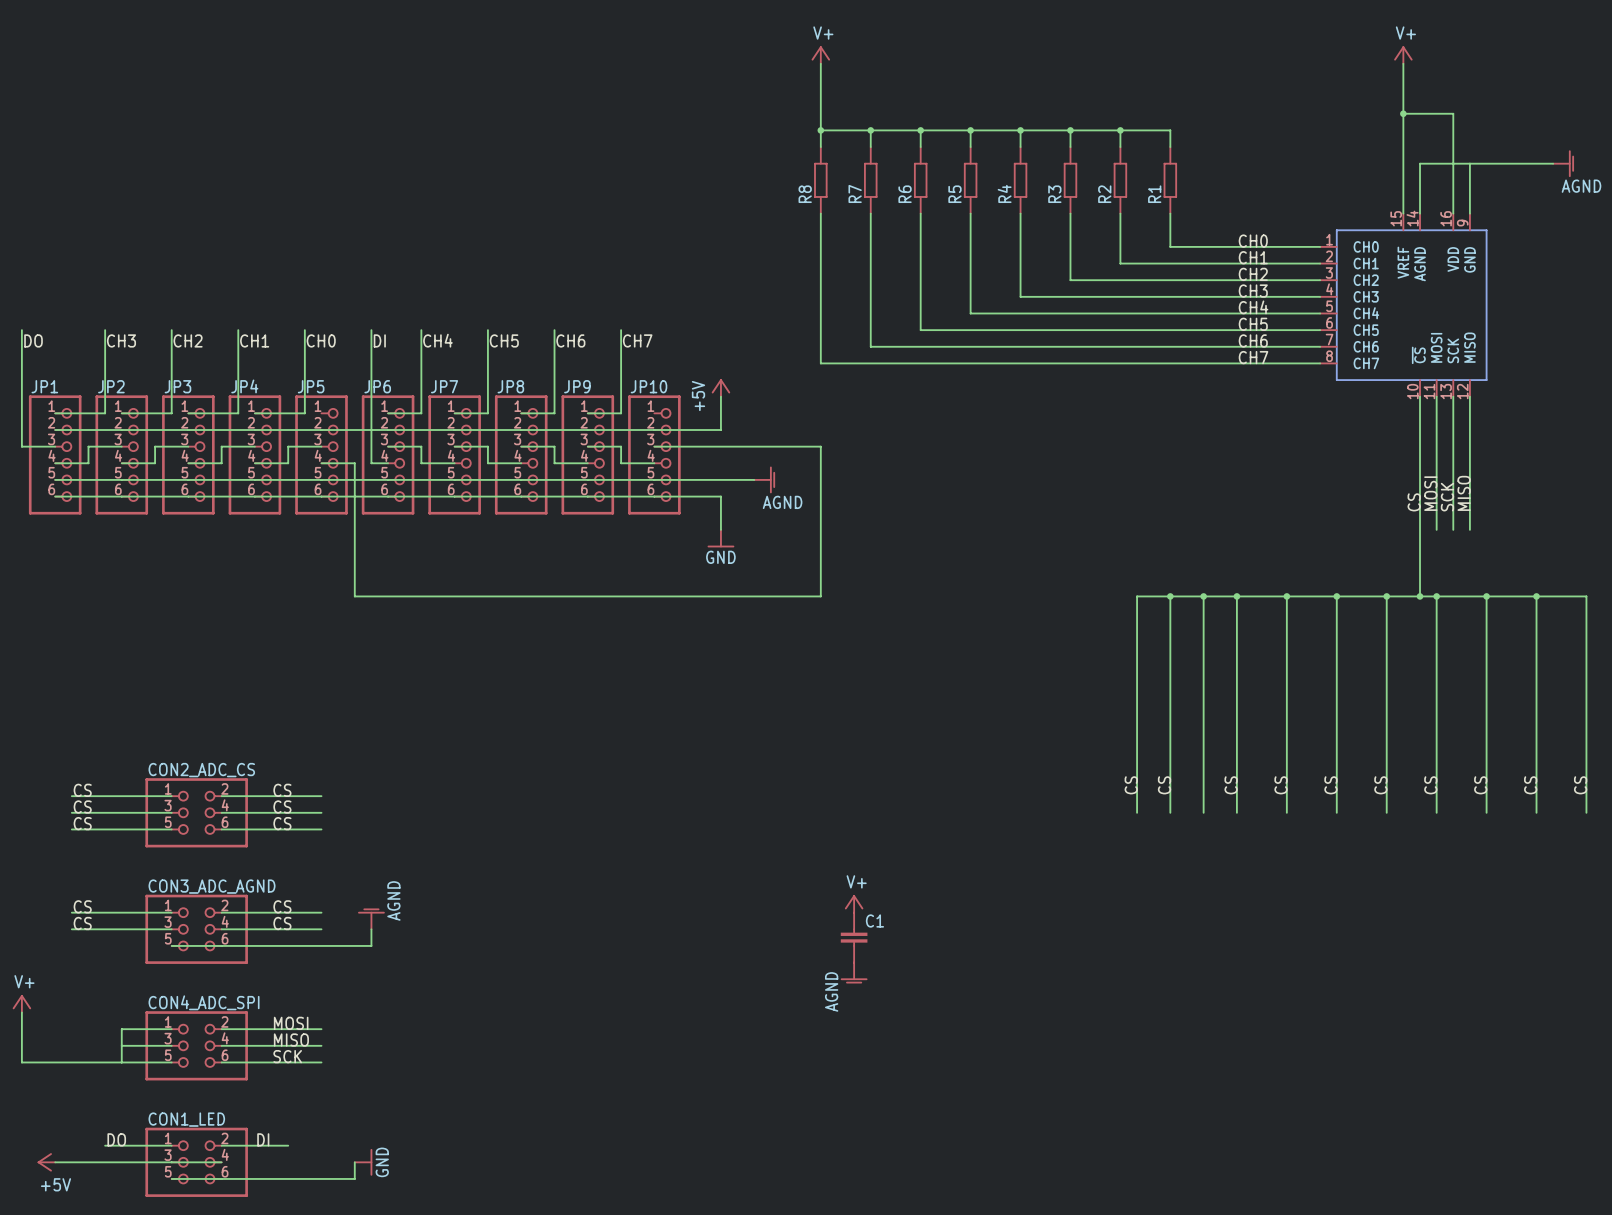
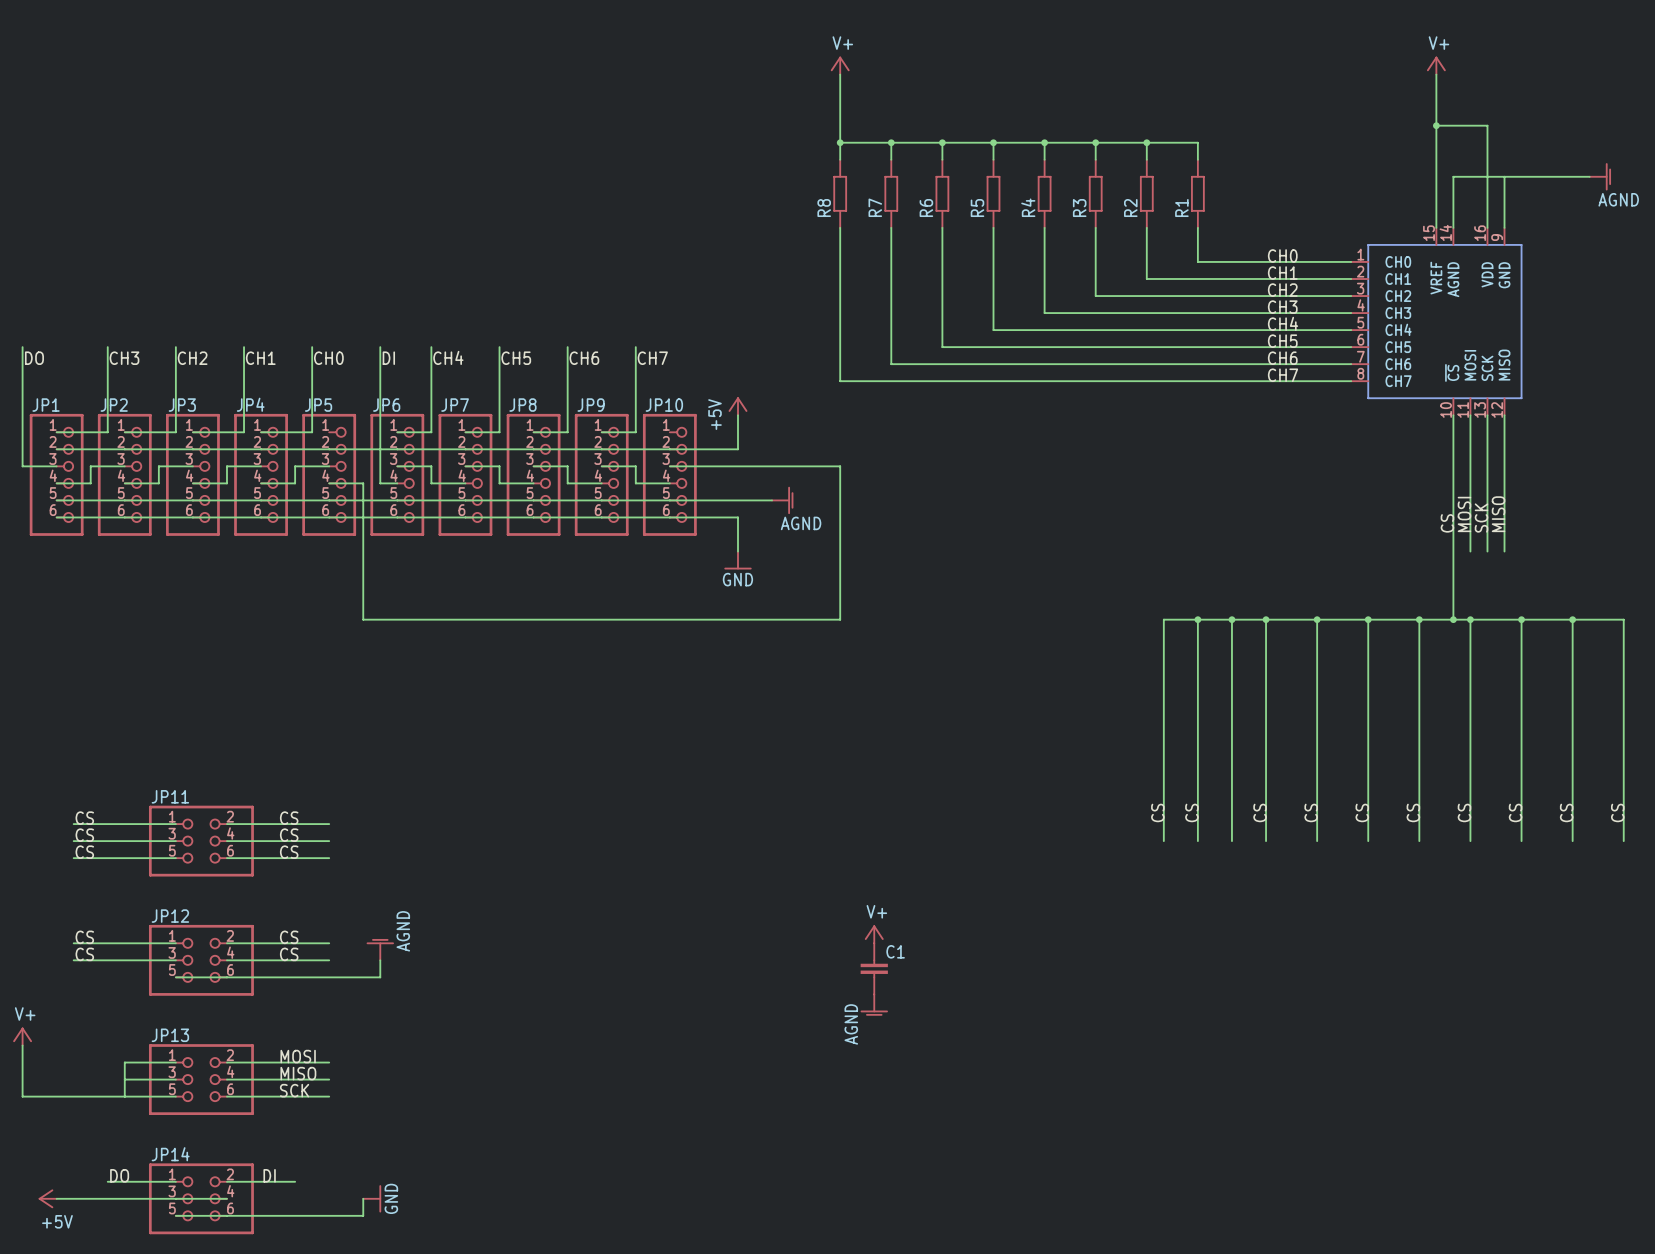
CON2_ADC_CS name: CON2_ADC_CS (201, 770) -> JP11 (170, 796)
CON3_ADC_AGND name: CON3_ADC_AGND (212, 886) -> JP12 (170, 916)
CON4_ADC_SPI name: CON4_ADC_SPI (204, 1002) -> JP13 (170, 1035)
CON1_LED name: CON1_LED (186, 1119) -> JP14 (170, 1154)

